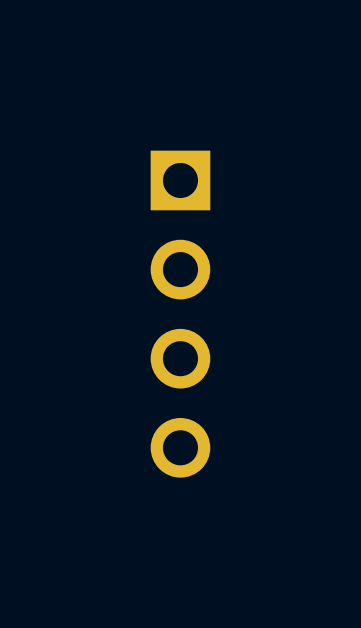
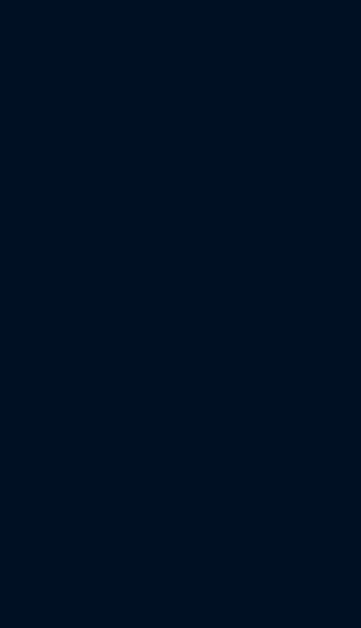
part: (180, 314) -> none

